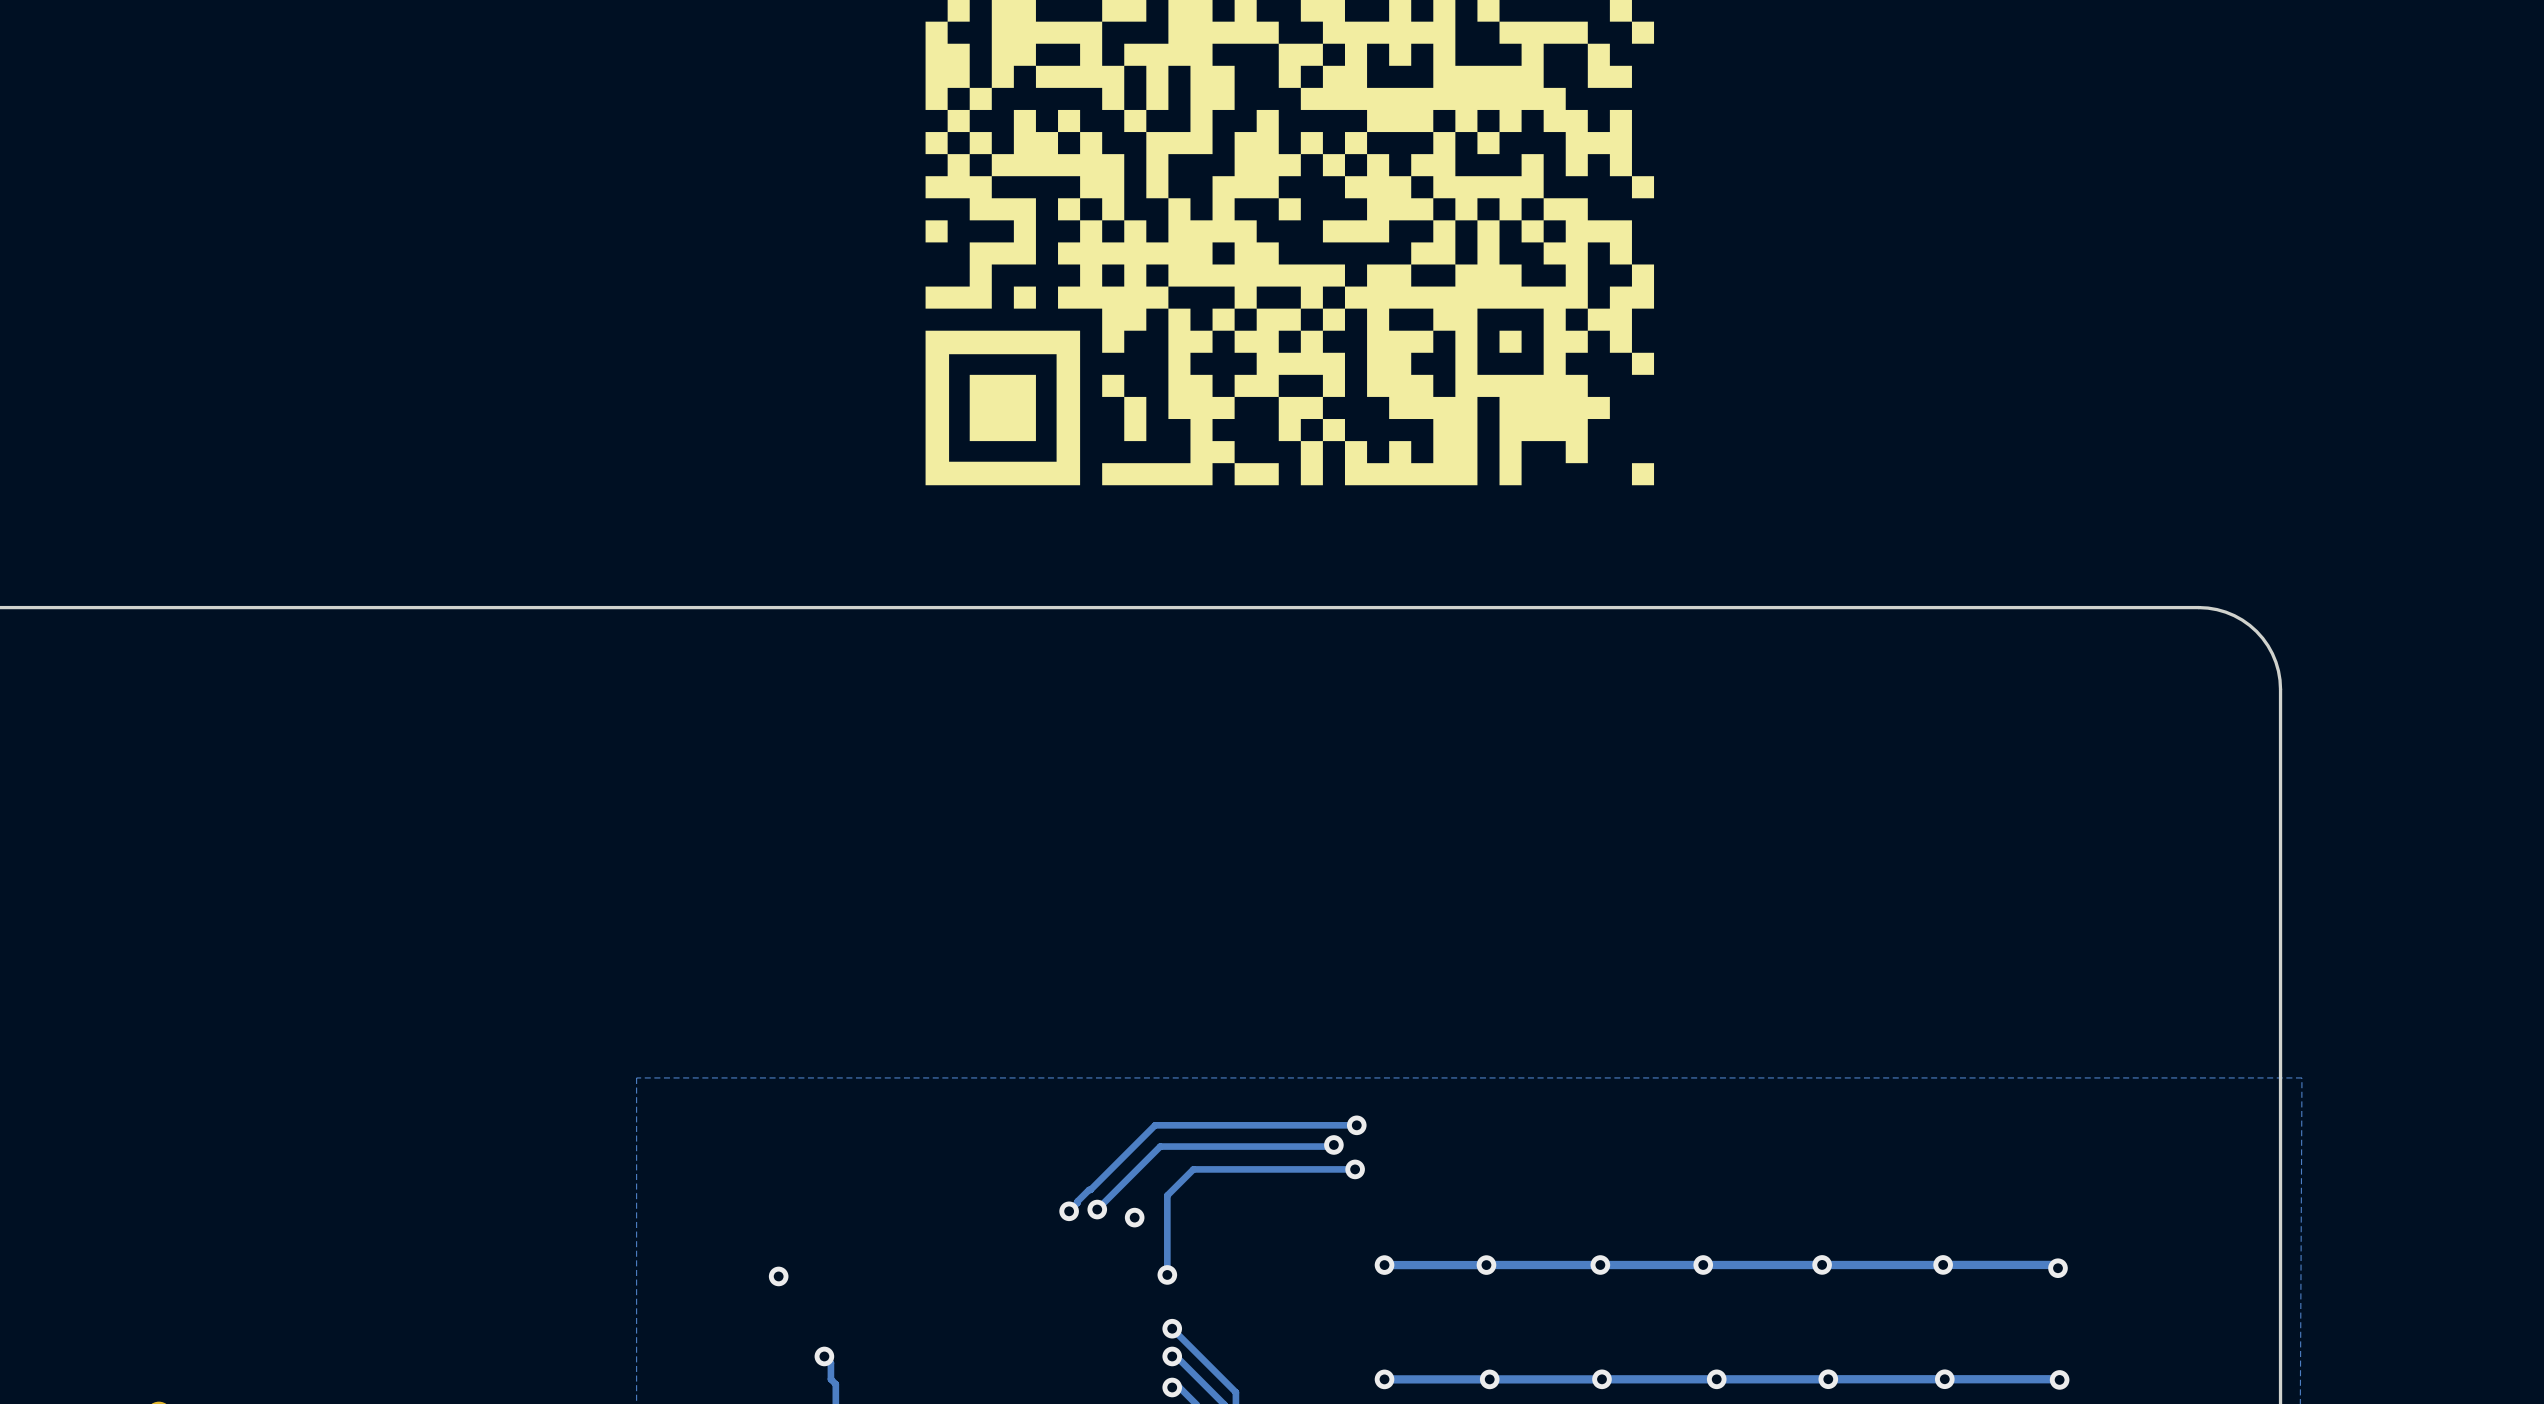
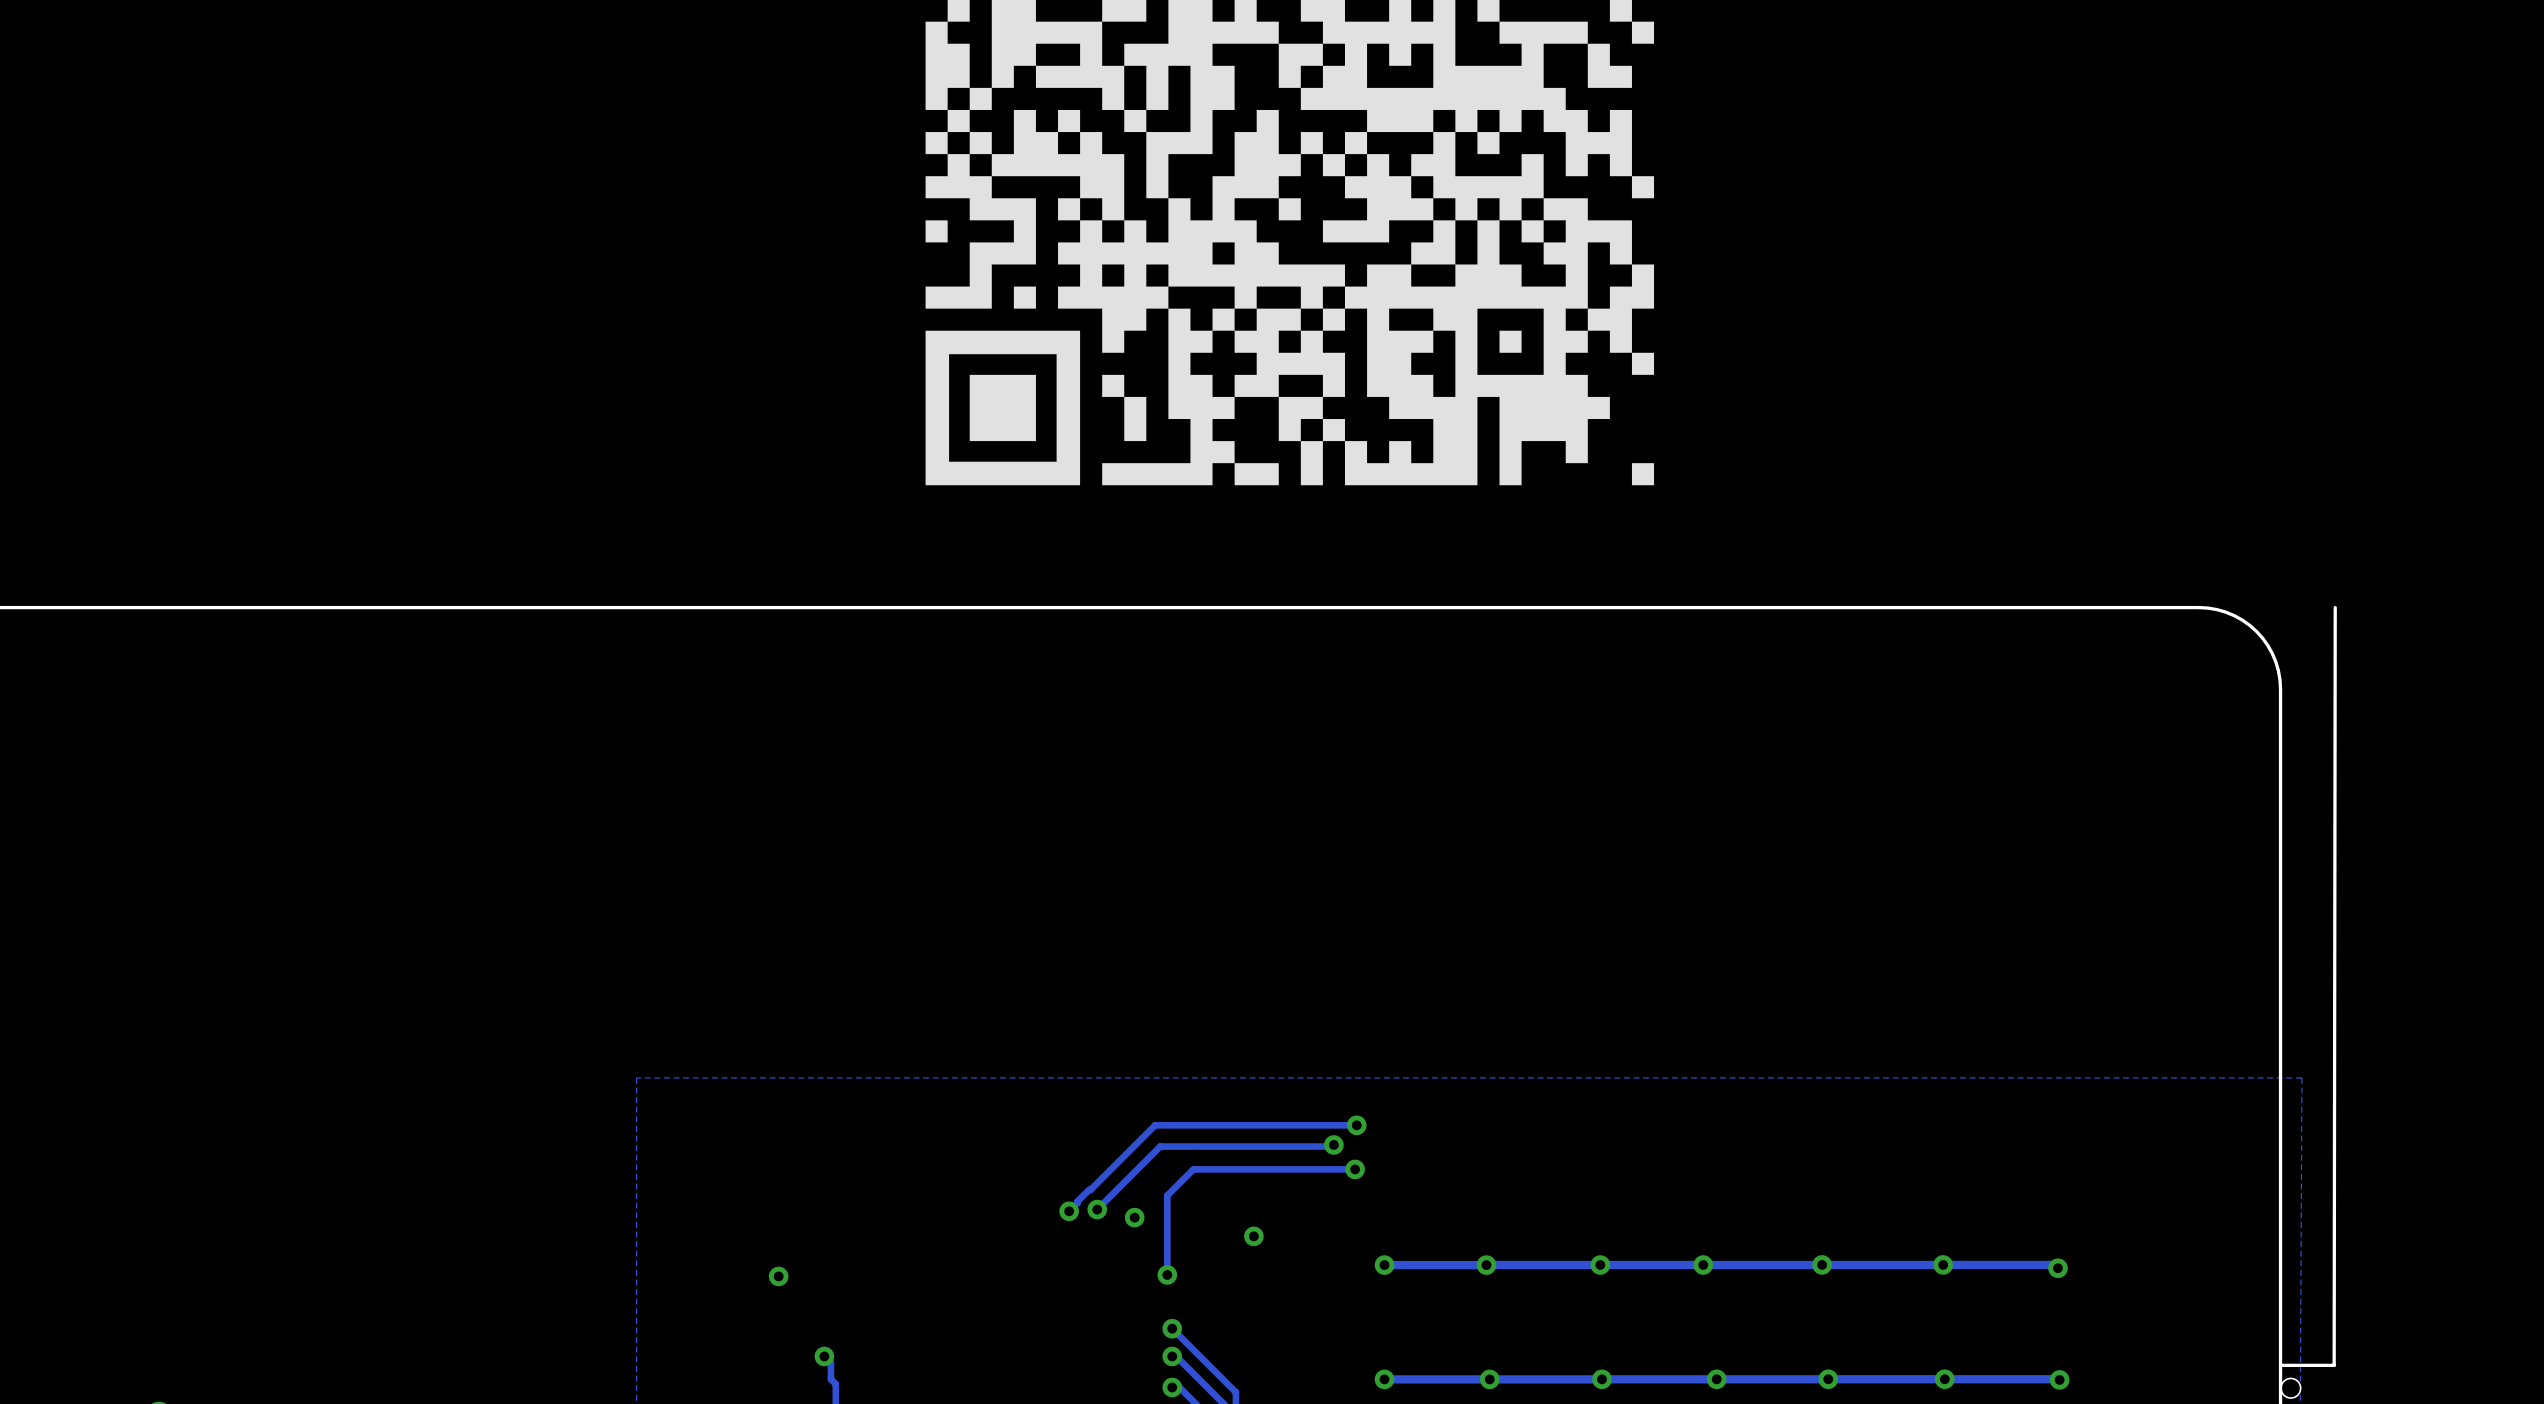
board edge: none -> (2335, 607) (2334, 1365) (2281, 1365)
via: none -> (1253, 1236)
round board edge: none -> [2280, 1377, 2302, 1399]

